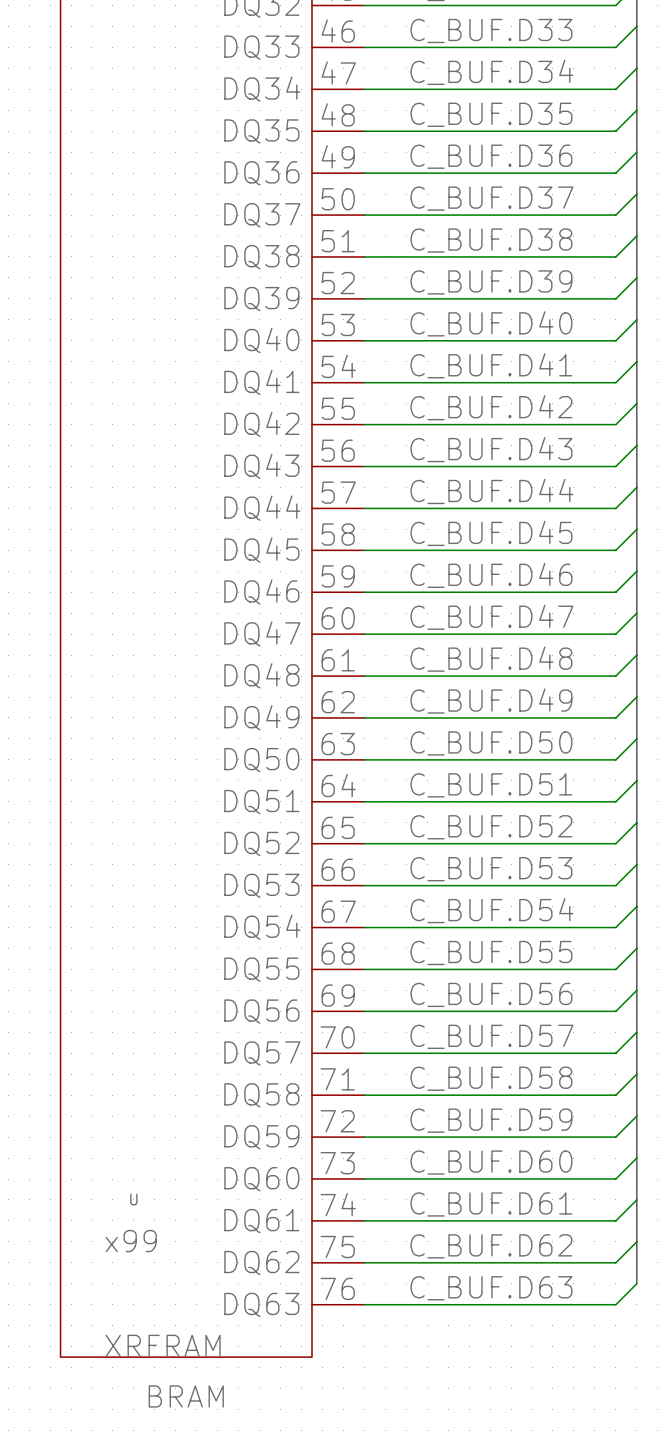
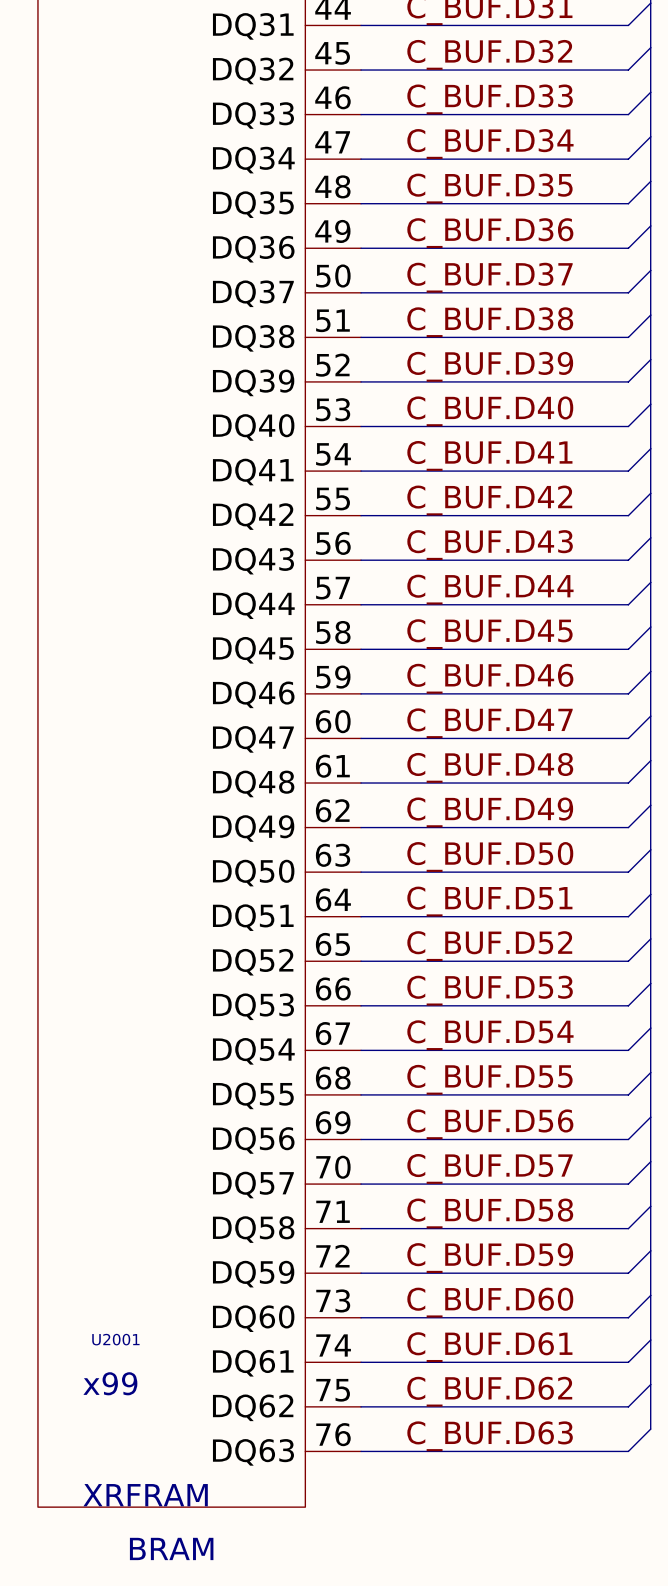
U name: U (133, 1199) -> U2001 (115, 1339)

